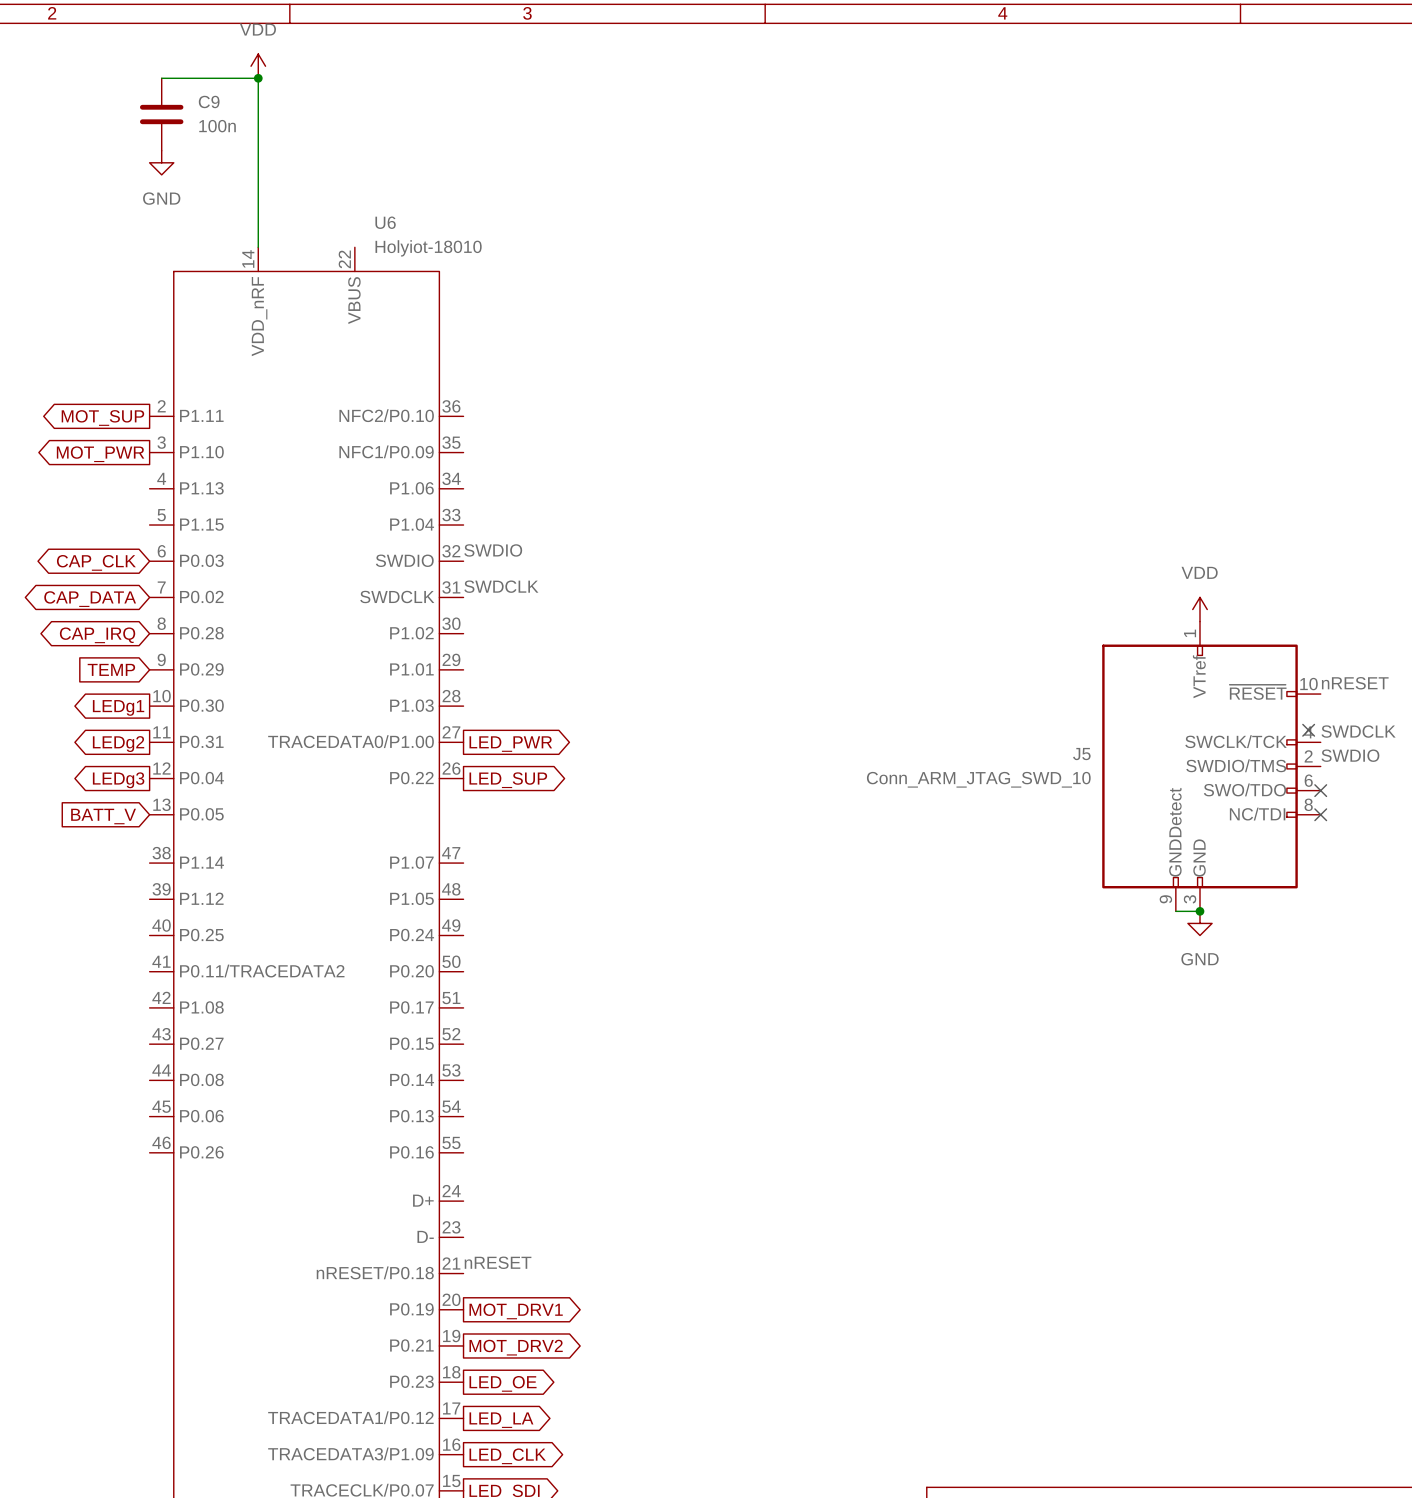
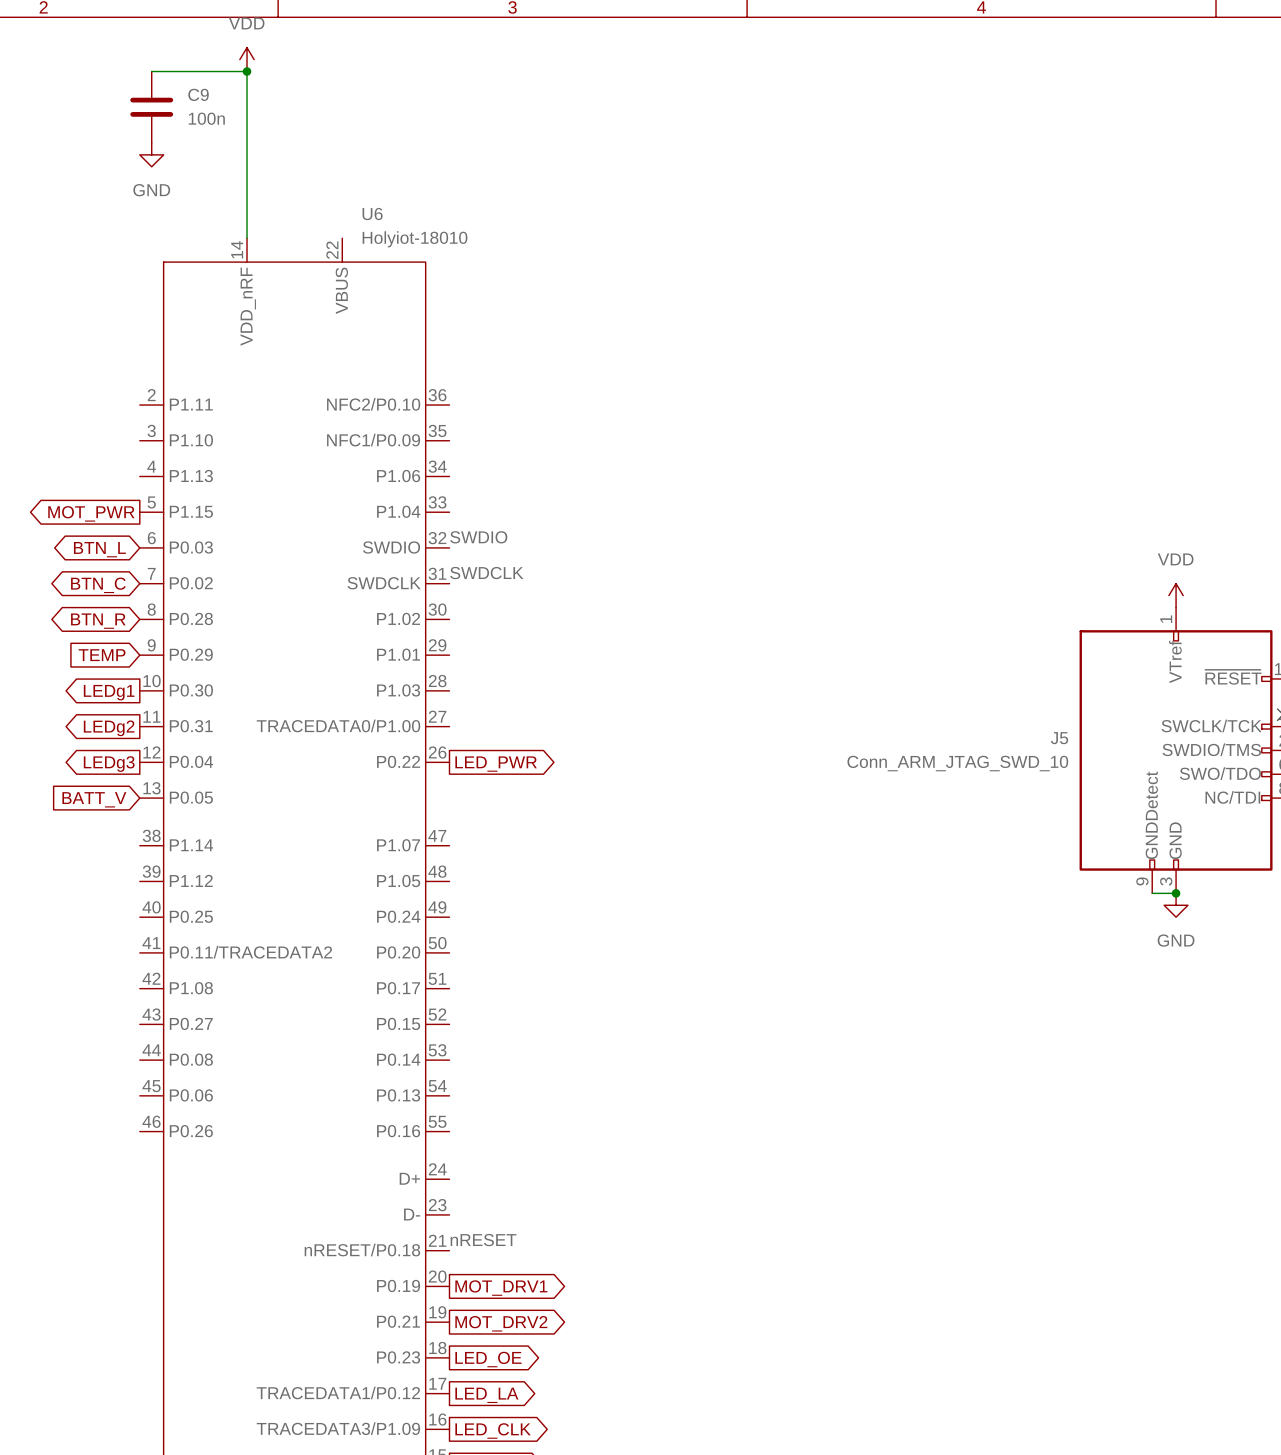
global label: MOT_SUP (102, 418) -> none
global label position: MOT_PWR (100, 454) -> MOT_PWR (91, 513)
global label: CAP_CLK (96, 562) -> BTN_L (99, 549)
global label: CAP_DATA (90, 599) -> BTN_C (98, 585)
global label: CAP_IRQ (97, 635) -> BTN_R (98, 621)
global label: LED_PWR (510, 744) -> none
global label: LED_SUP (508, 780) -> LED_PWR (496, 764)

